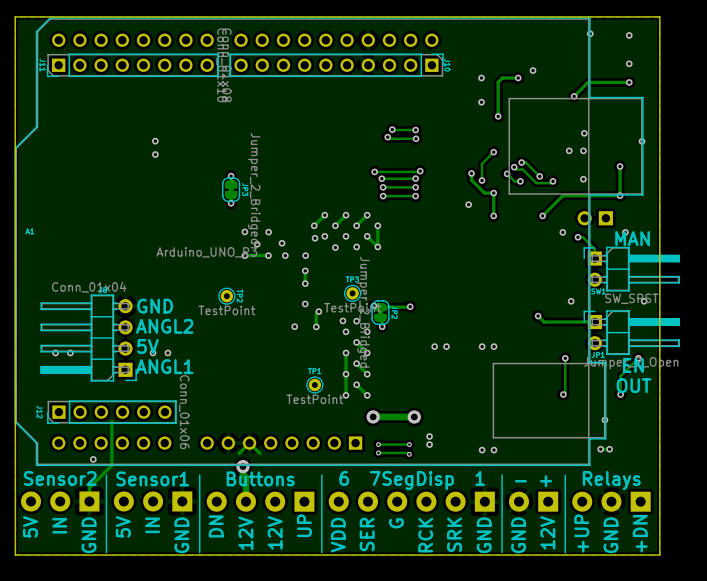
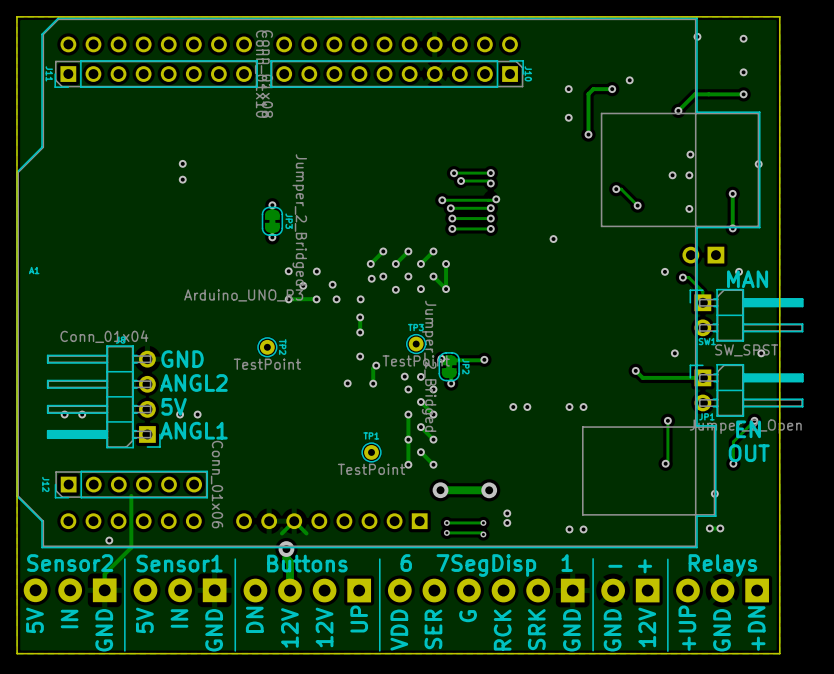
track: (392, 129) (415, 130) -> none
via: (392, 129) -> none
via: (415, 130) -> none
track: (387, 137) (389, 138) (416, 138) -> none
via: (387, 137) -> none
via: (416, 138) -> none
track: none -> (490, 173) (454, 173)
via: none -> (490, 173)
via: none -> (454, 173)
track: (493, 152) (482, 163) (482, 180) -> none
via: (493, 152) -> none
track: none -> (461, 181) (488, 181) (490, 183)
via: none -> (461, 181)
via: none -> (490, 183)
track: (514, 167) (516, 169) (522, 169) (536, 183) (551, 183) (552, 181) -> none
via: (514, 167) -> none
track: (471, 173) (471, 180) (484, 193) (493, 193) (493, 215) -> none
via: (471, 173) -> none
track: (507, 173) (514, 181) (520, 181) -> none
via: (507, 173) -> none
via: (482, 180) -> none
via: (520, 181) -> none
via: (552, 181) -> none
via: (493, 193) -> none
track: (620, 195) (562, 195) (542, 215) -> none
via: (493, 215) -> none
via: (542, 215) -> none

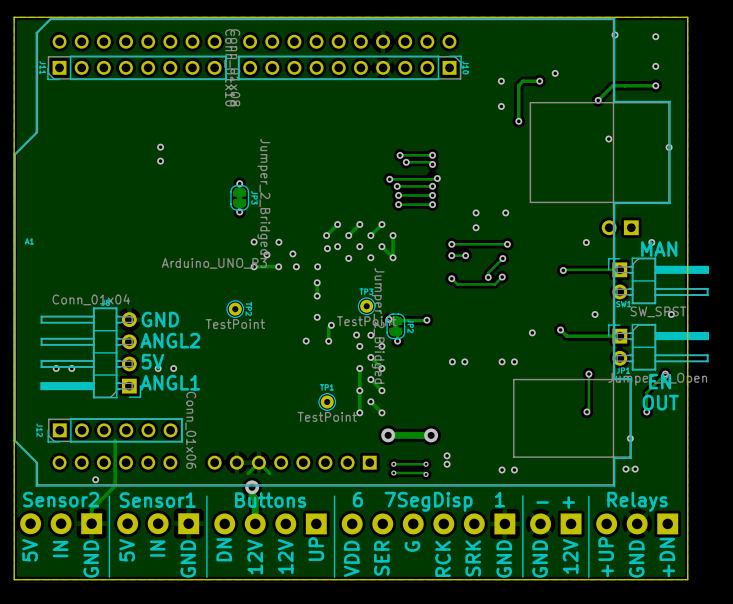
via: (672, 175) -> none
via: (689, 175) -> none
track: (616, 189) (621, 189) (637, 205) -> none
via: (616, 189) -> none
track: (732, 193) (732, 228) -> none
via: (732, 193) -> none
via: (637, 205) -> none
via: (689, 208) -> none
via: (732, 228) -> none
via: none -> (476, 212)
via: none -> (505, 212)
via: (553, 239) -> none
via: none -> (476, 227)
via: none -> (451, 244)
track: none -> (507, 244) (451, 244)
via: none -> (507, 244)
track: (682, 277) (688, 277) (702, 291) (702, 302) -> (563, 270) (619, 269)
via: (682, 277) -> none
via: none -> (451, 255)
track: none -> (465, 255) (451, 255)
via: none -> (465, 255)
track: none -> (502, 258) (488, 273) (488, 277)
via: none -> (502, 258)
via: none -> (563, 270)
track: none -> (502, 277) (494, 284) (457, 284) (451, 278)
via: none -> (502, 277)
via: none -> (488, 277)
via: none -> (451, 278)
via: none -> (532, 332)

